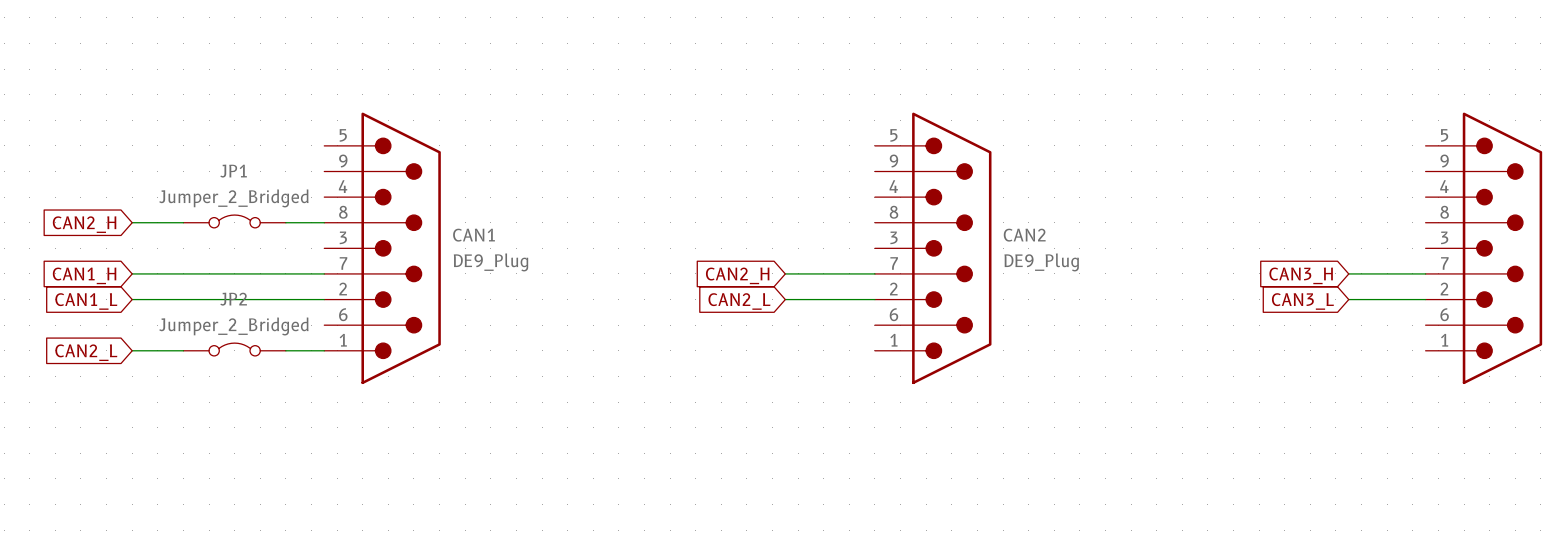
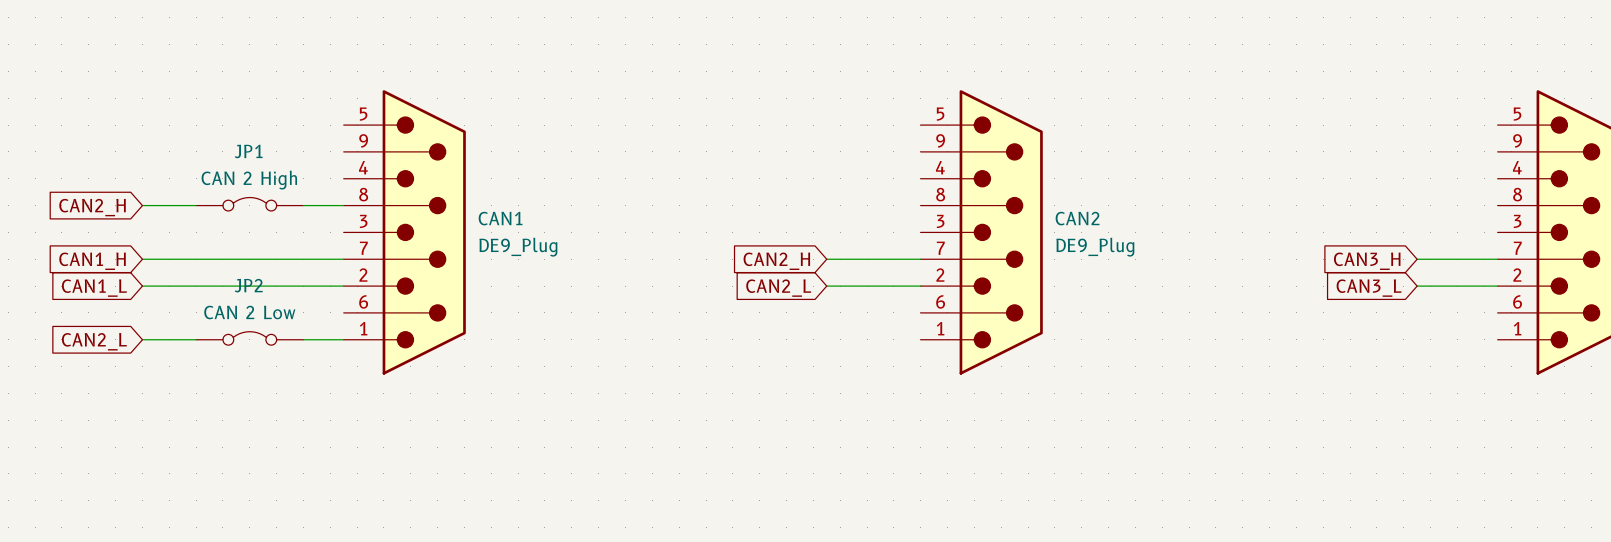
JP1 value: Jumper_2_Bridged (233, 198) -> CAN 2 High (249, 180)
JP2 value: Jumper_2_Bridged (233, 326) -> CAN 2 Low (249, 312)

